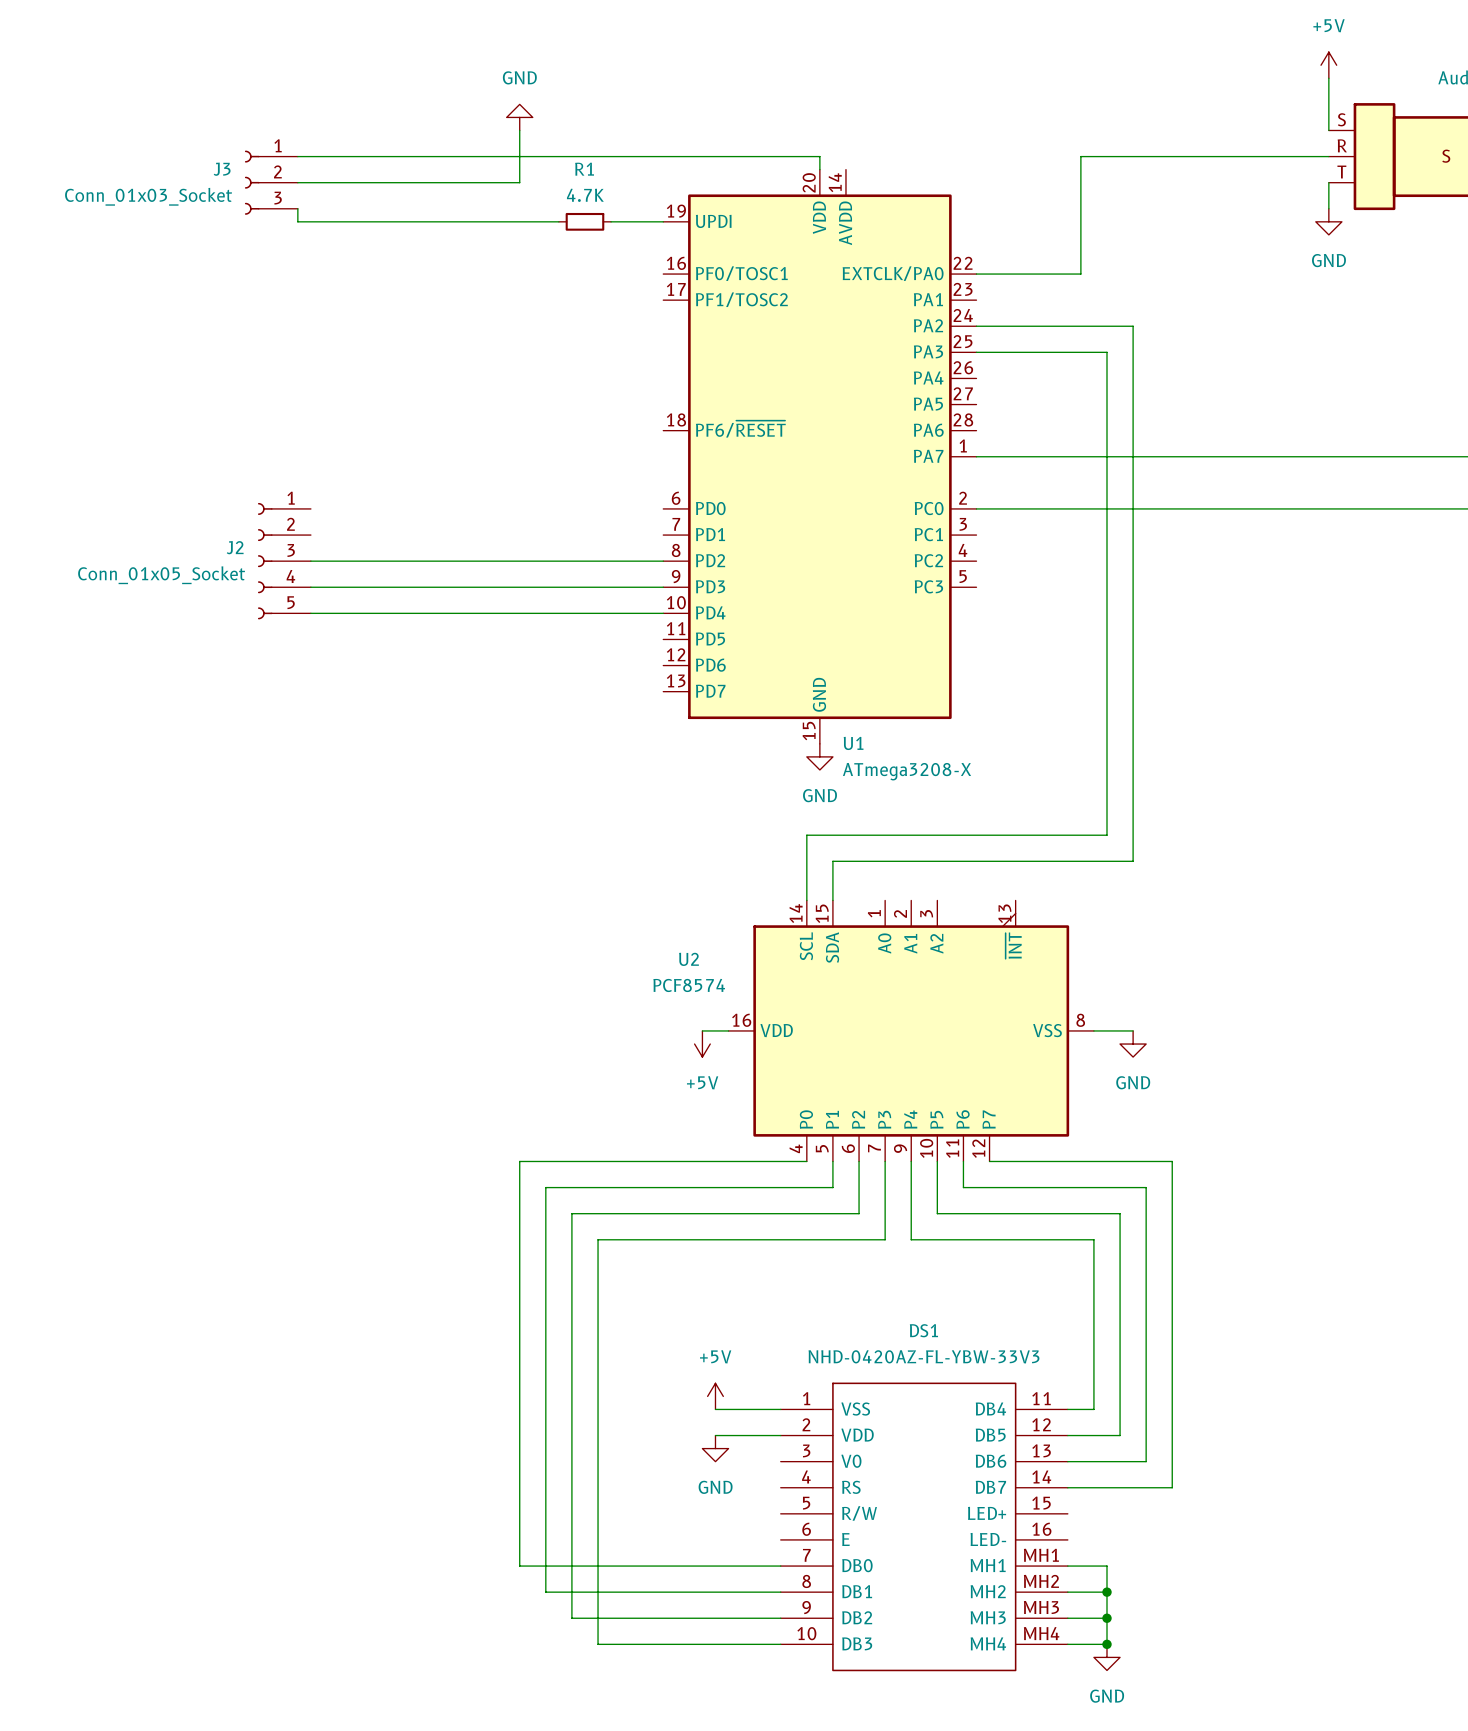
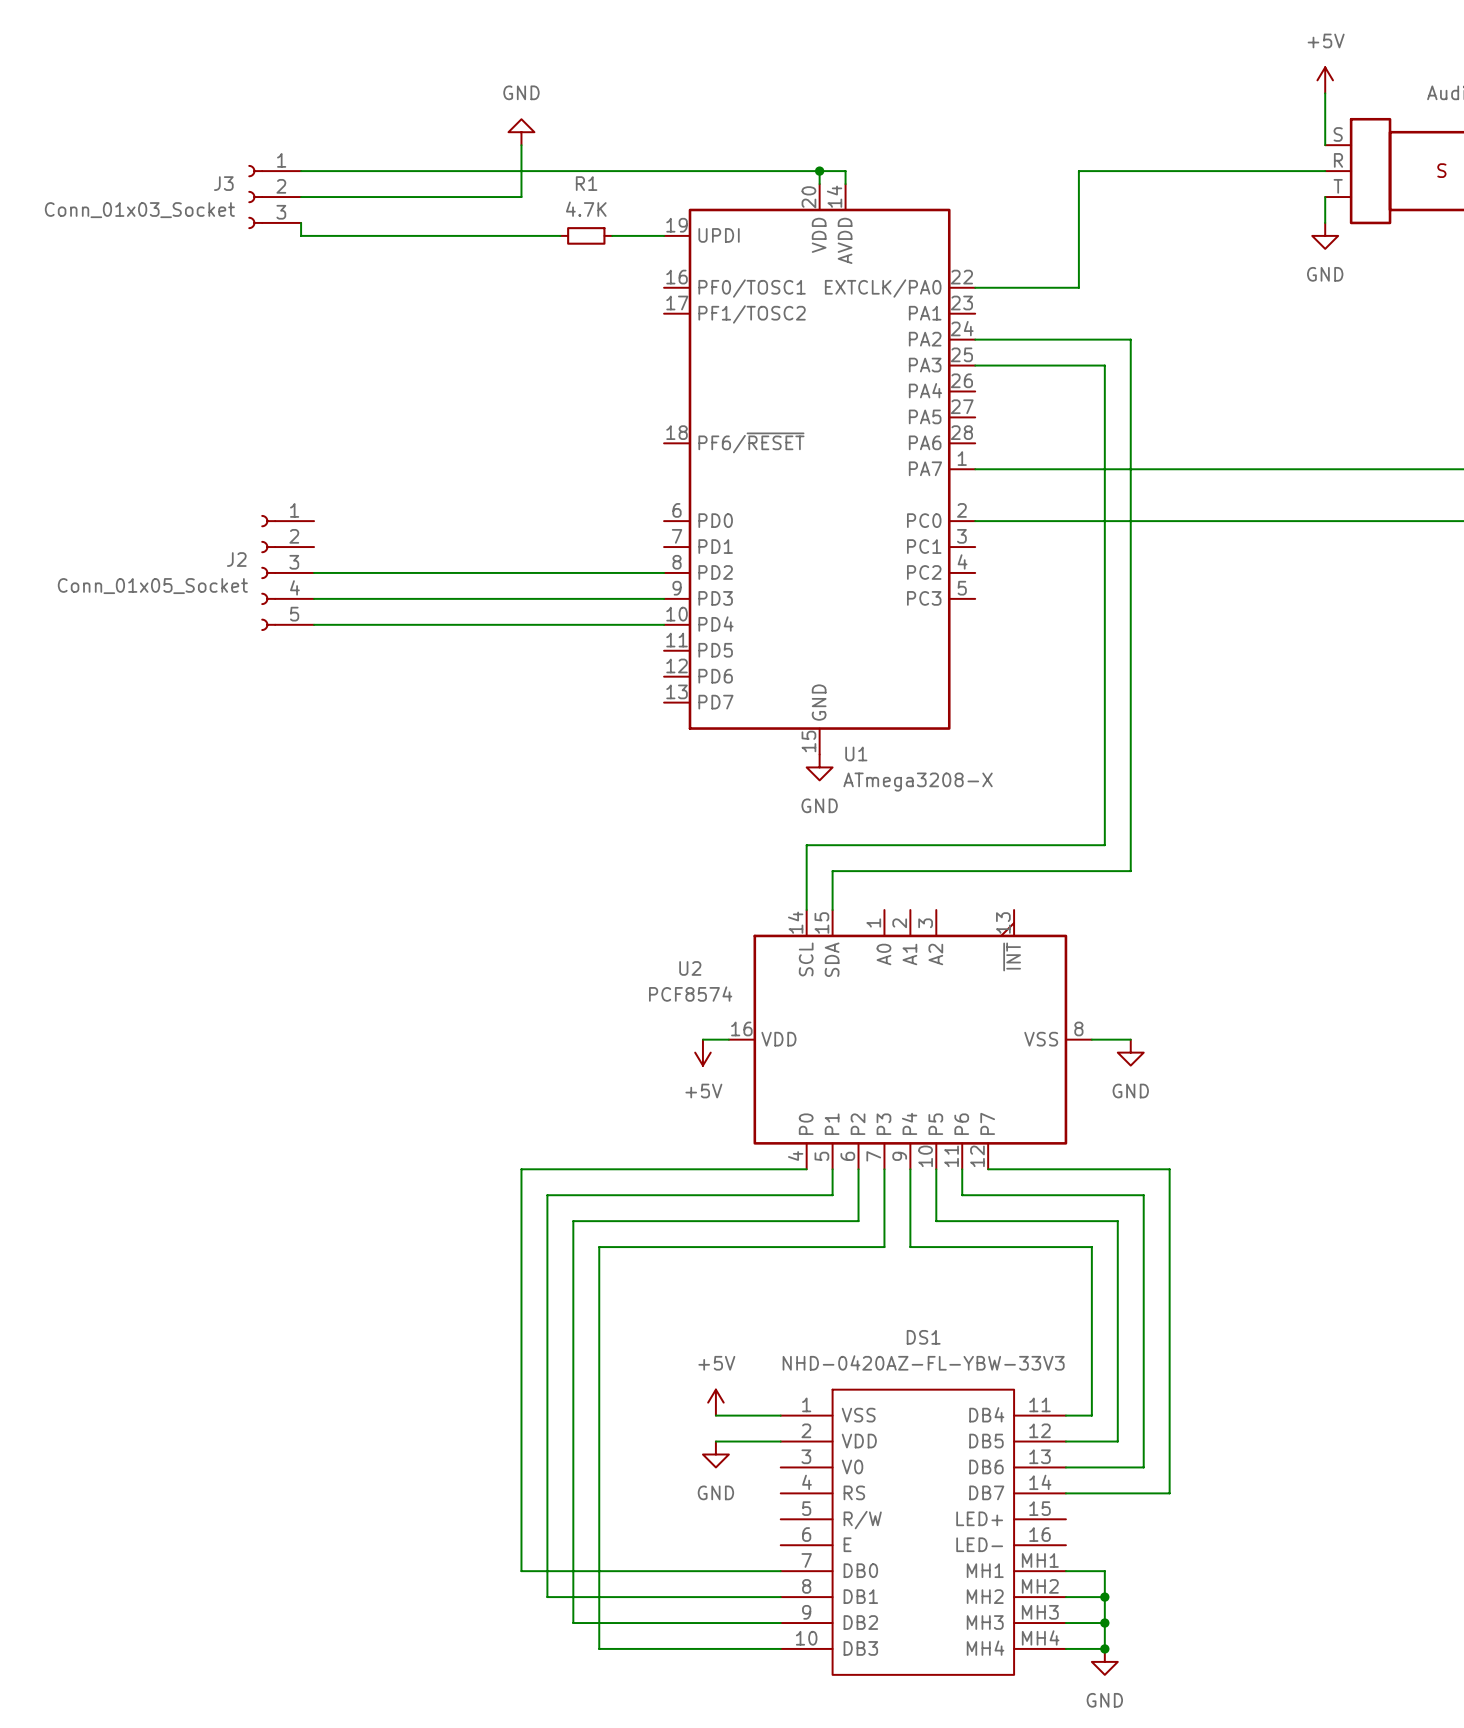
wire: none -> (819, 171) (845, 171) (845, 184)
junction: none -> (819, 171)

